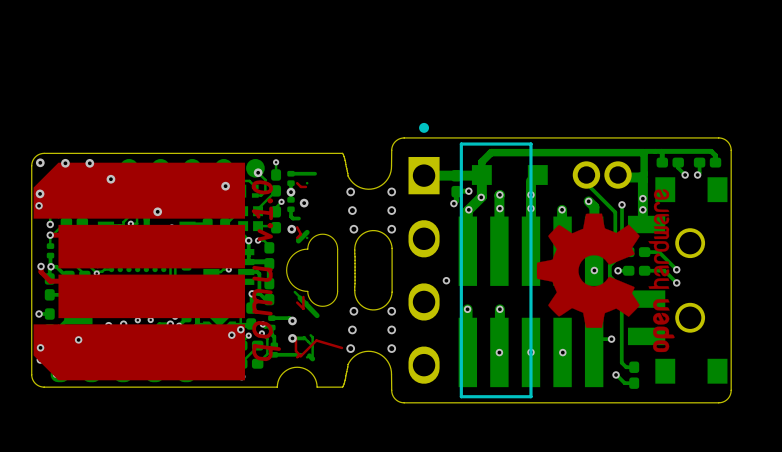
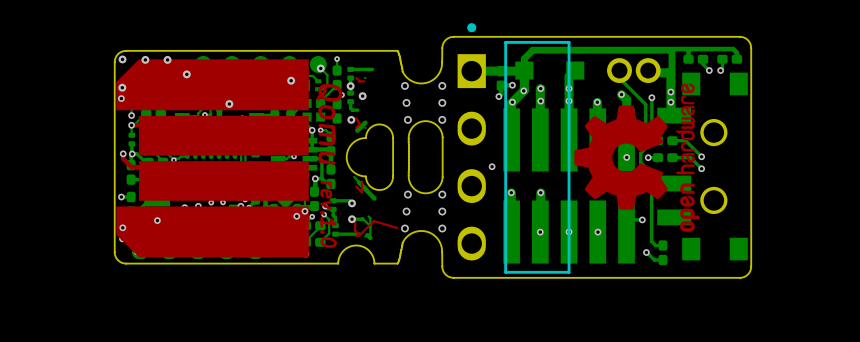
text: v.1.0 (262, 210) -> Qomu (329, 124)
text: qomu (266, 313) -> rev.1.0 (328, 214)

